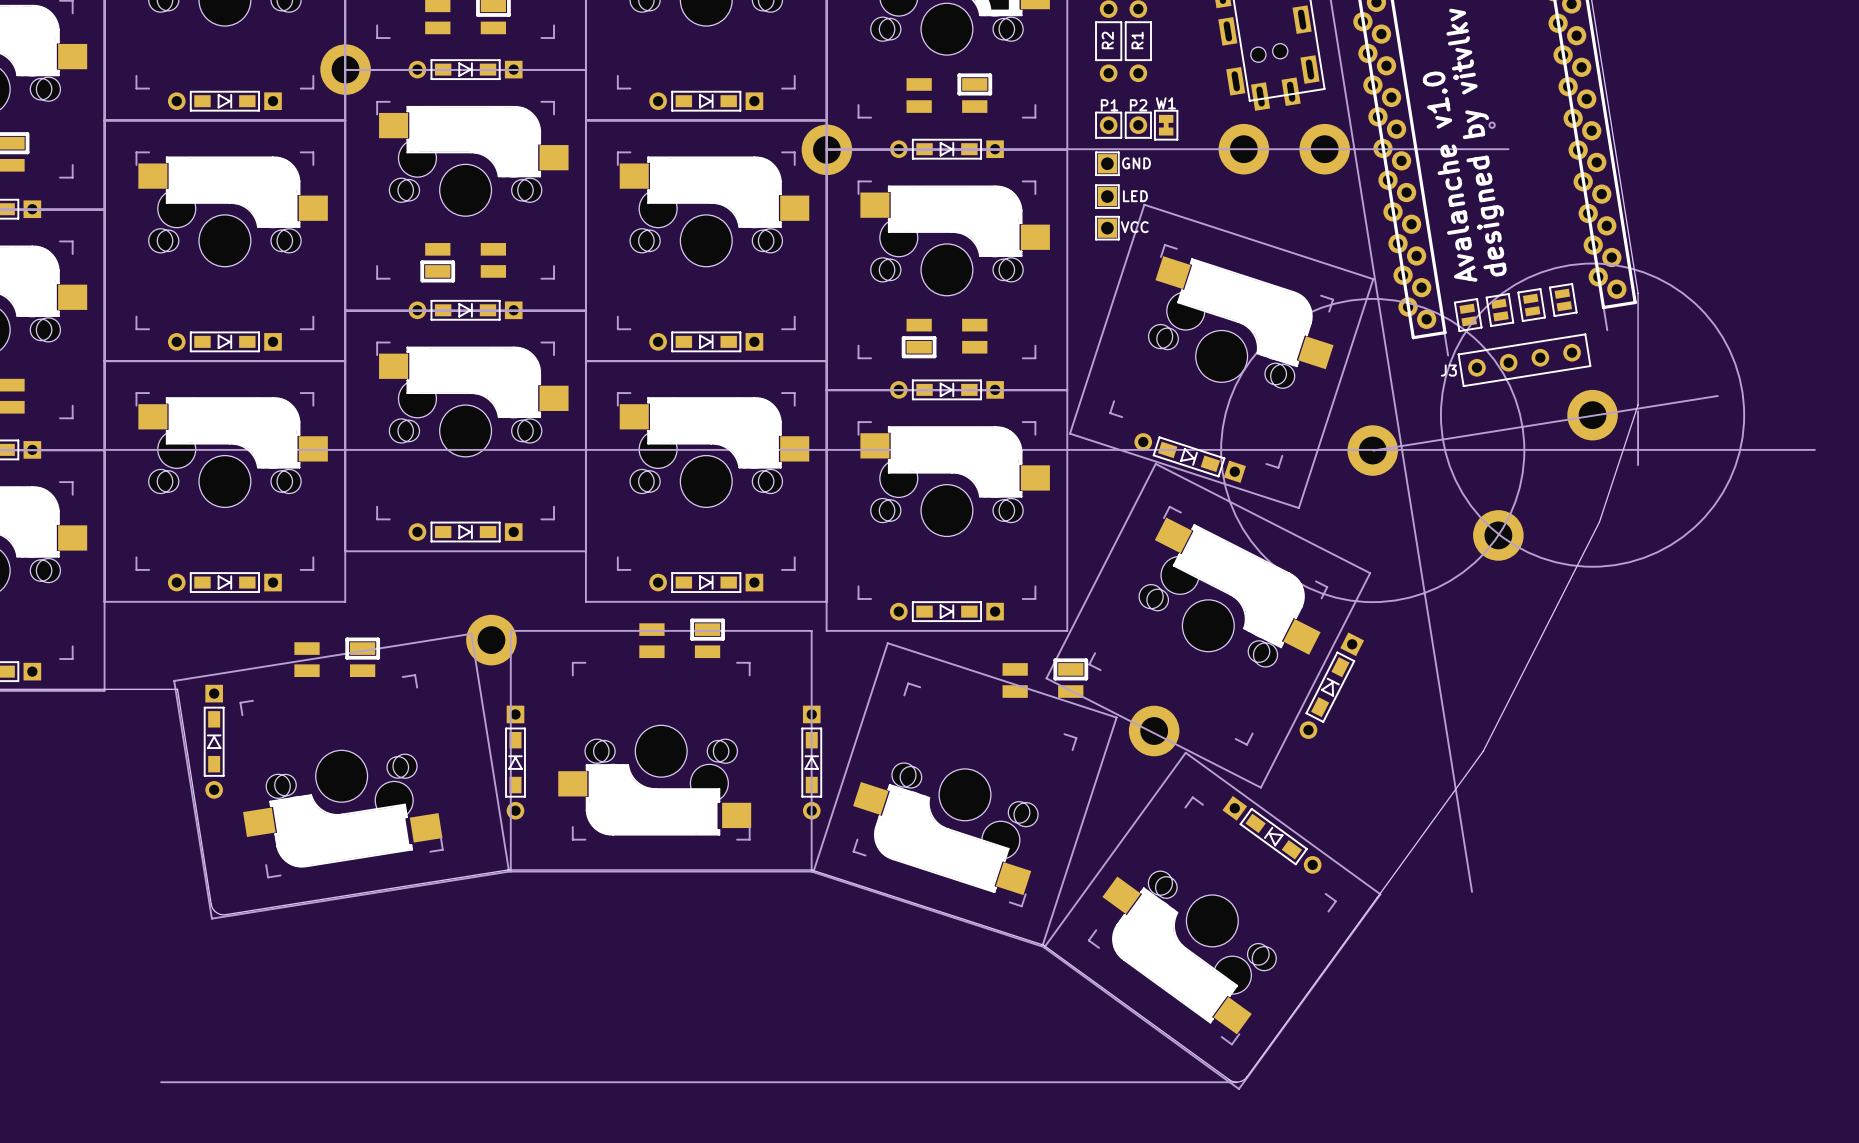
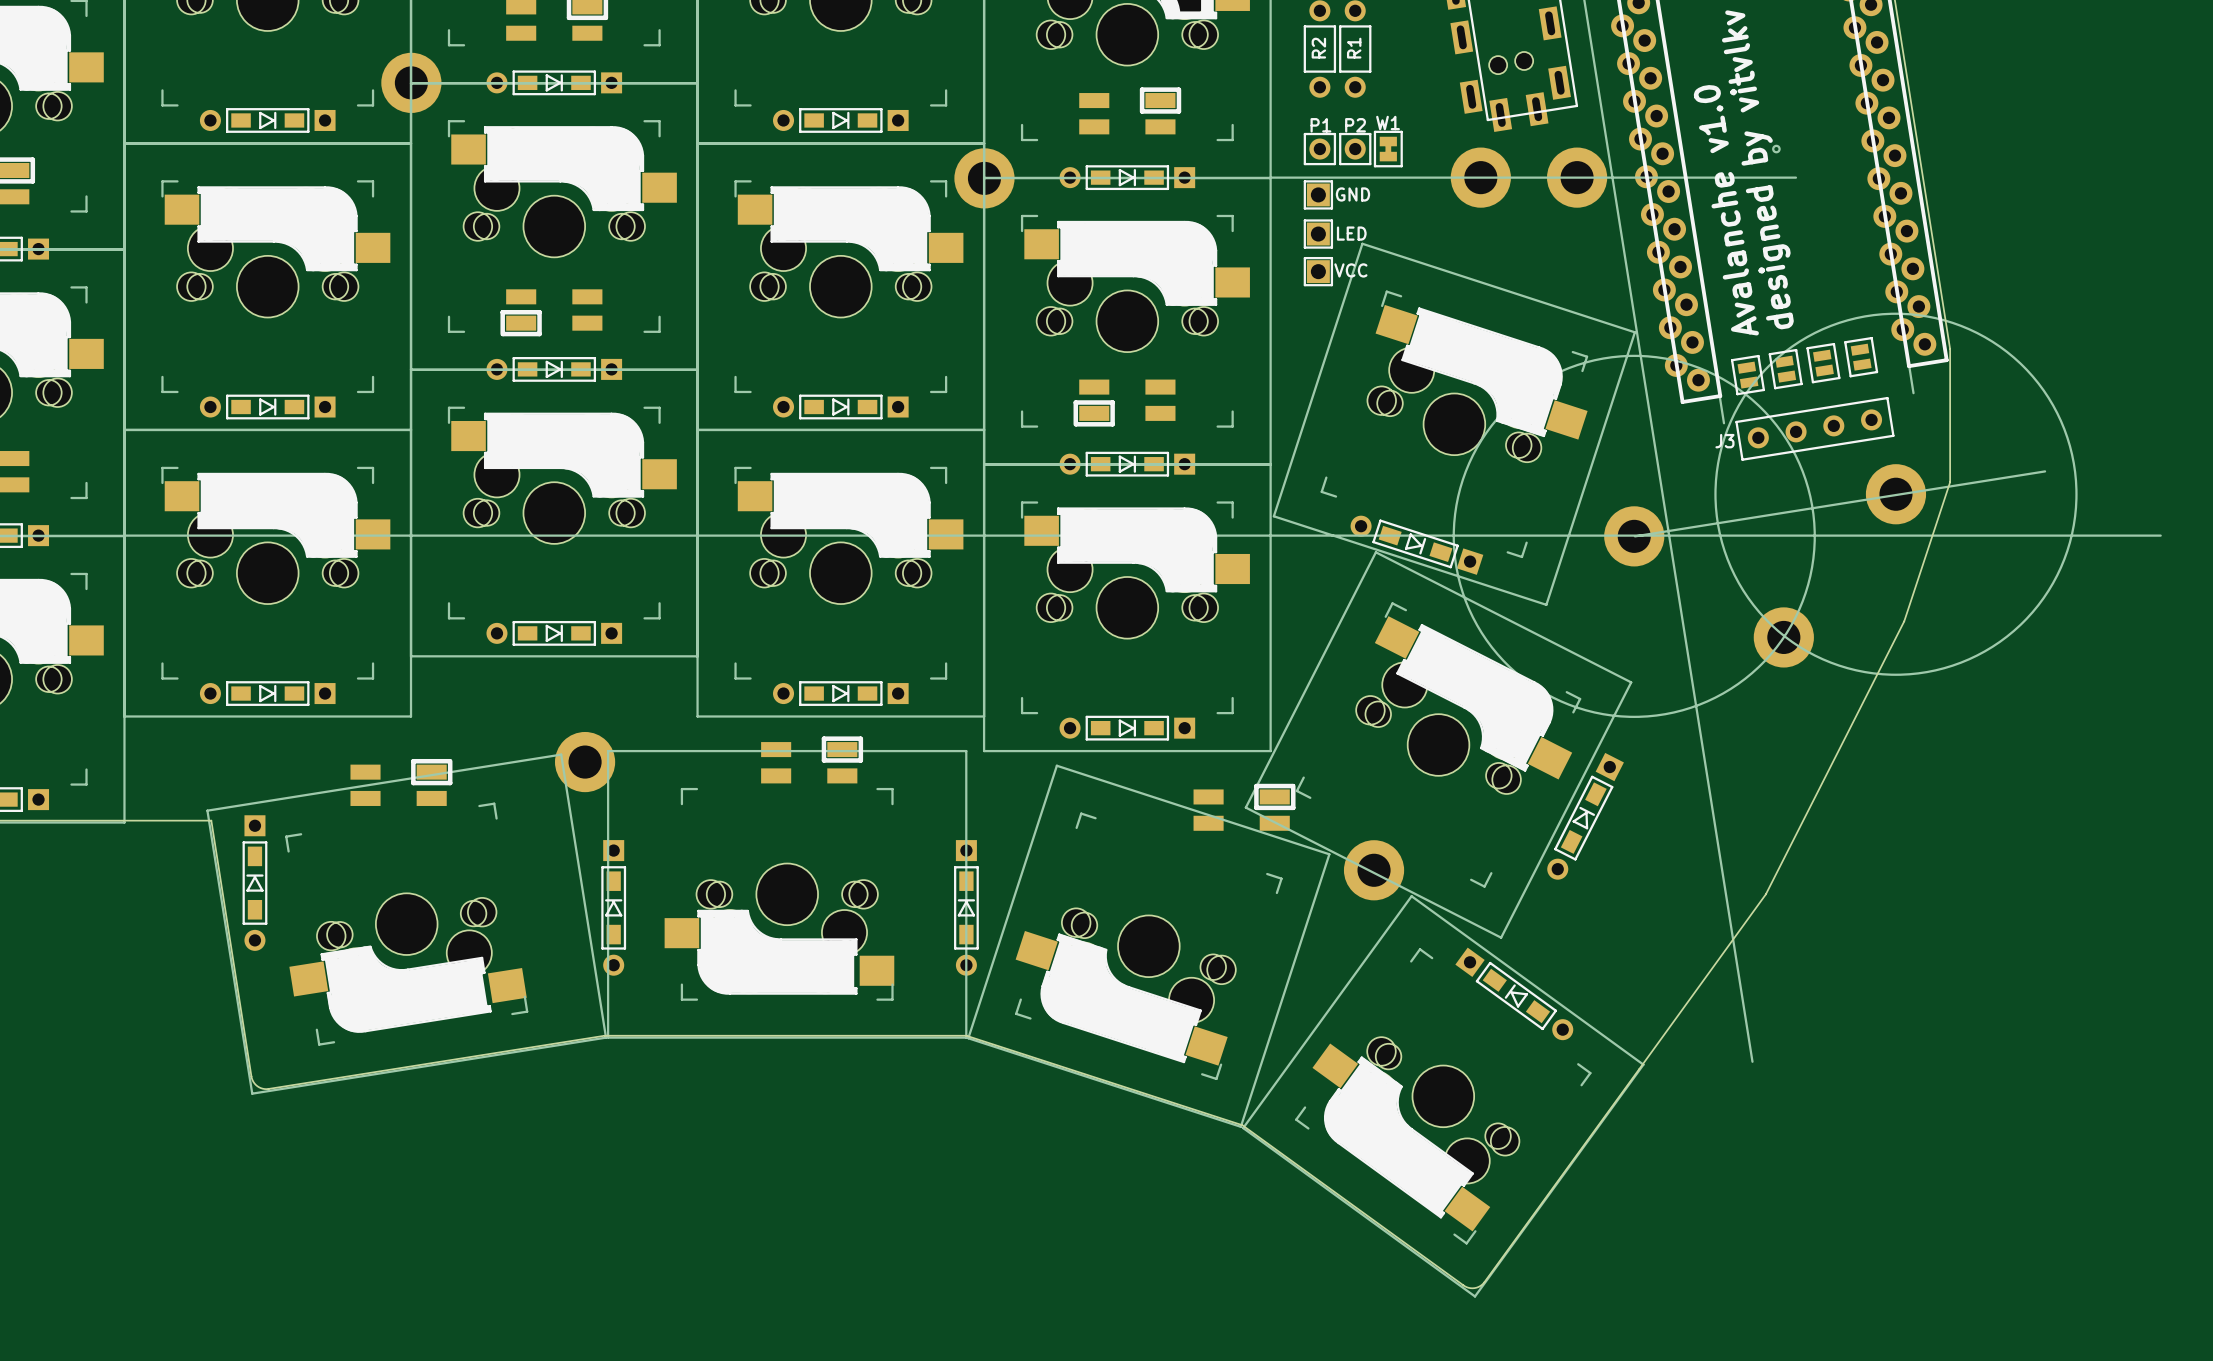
line: (1638, 411) (1638, 465) -> none
line: (161, 1082) (1236, 1082) -> none

